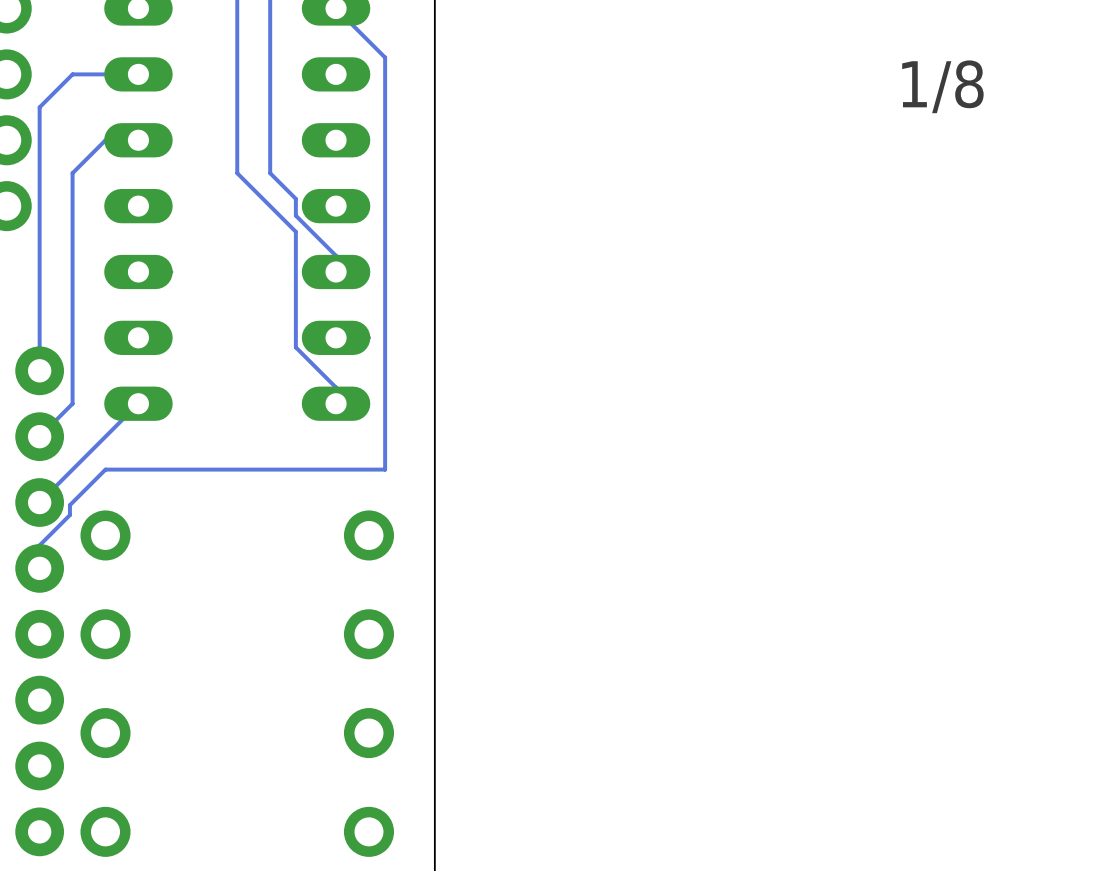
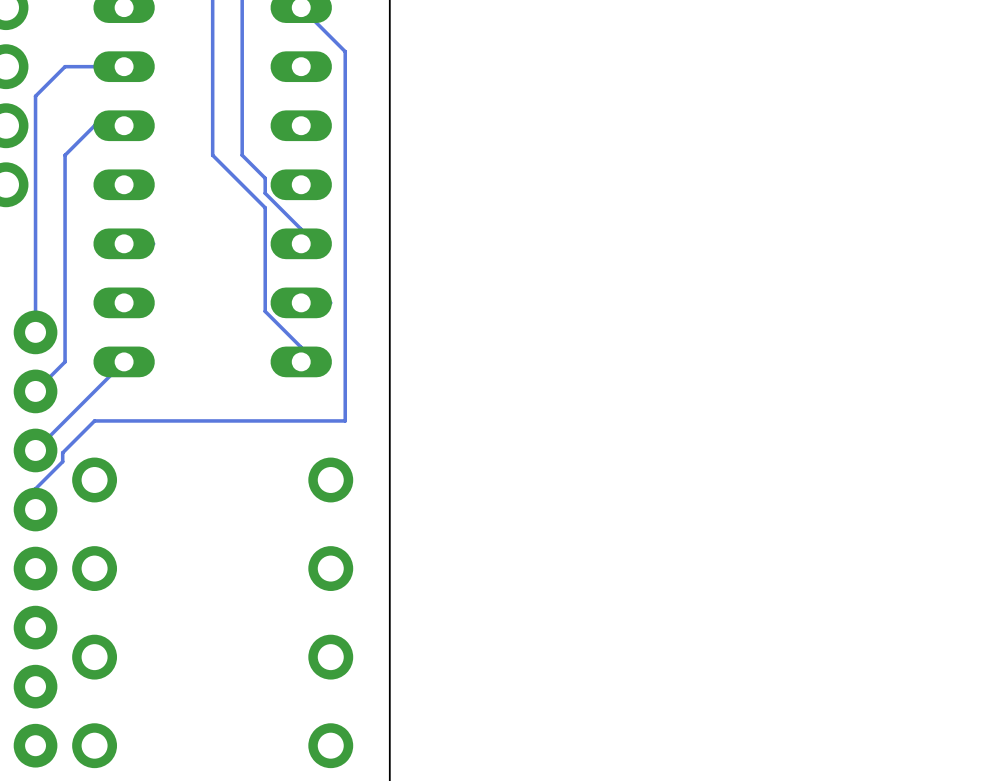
text: 1/8 (942, 86) -> none

